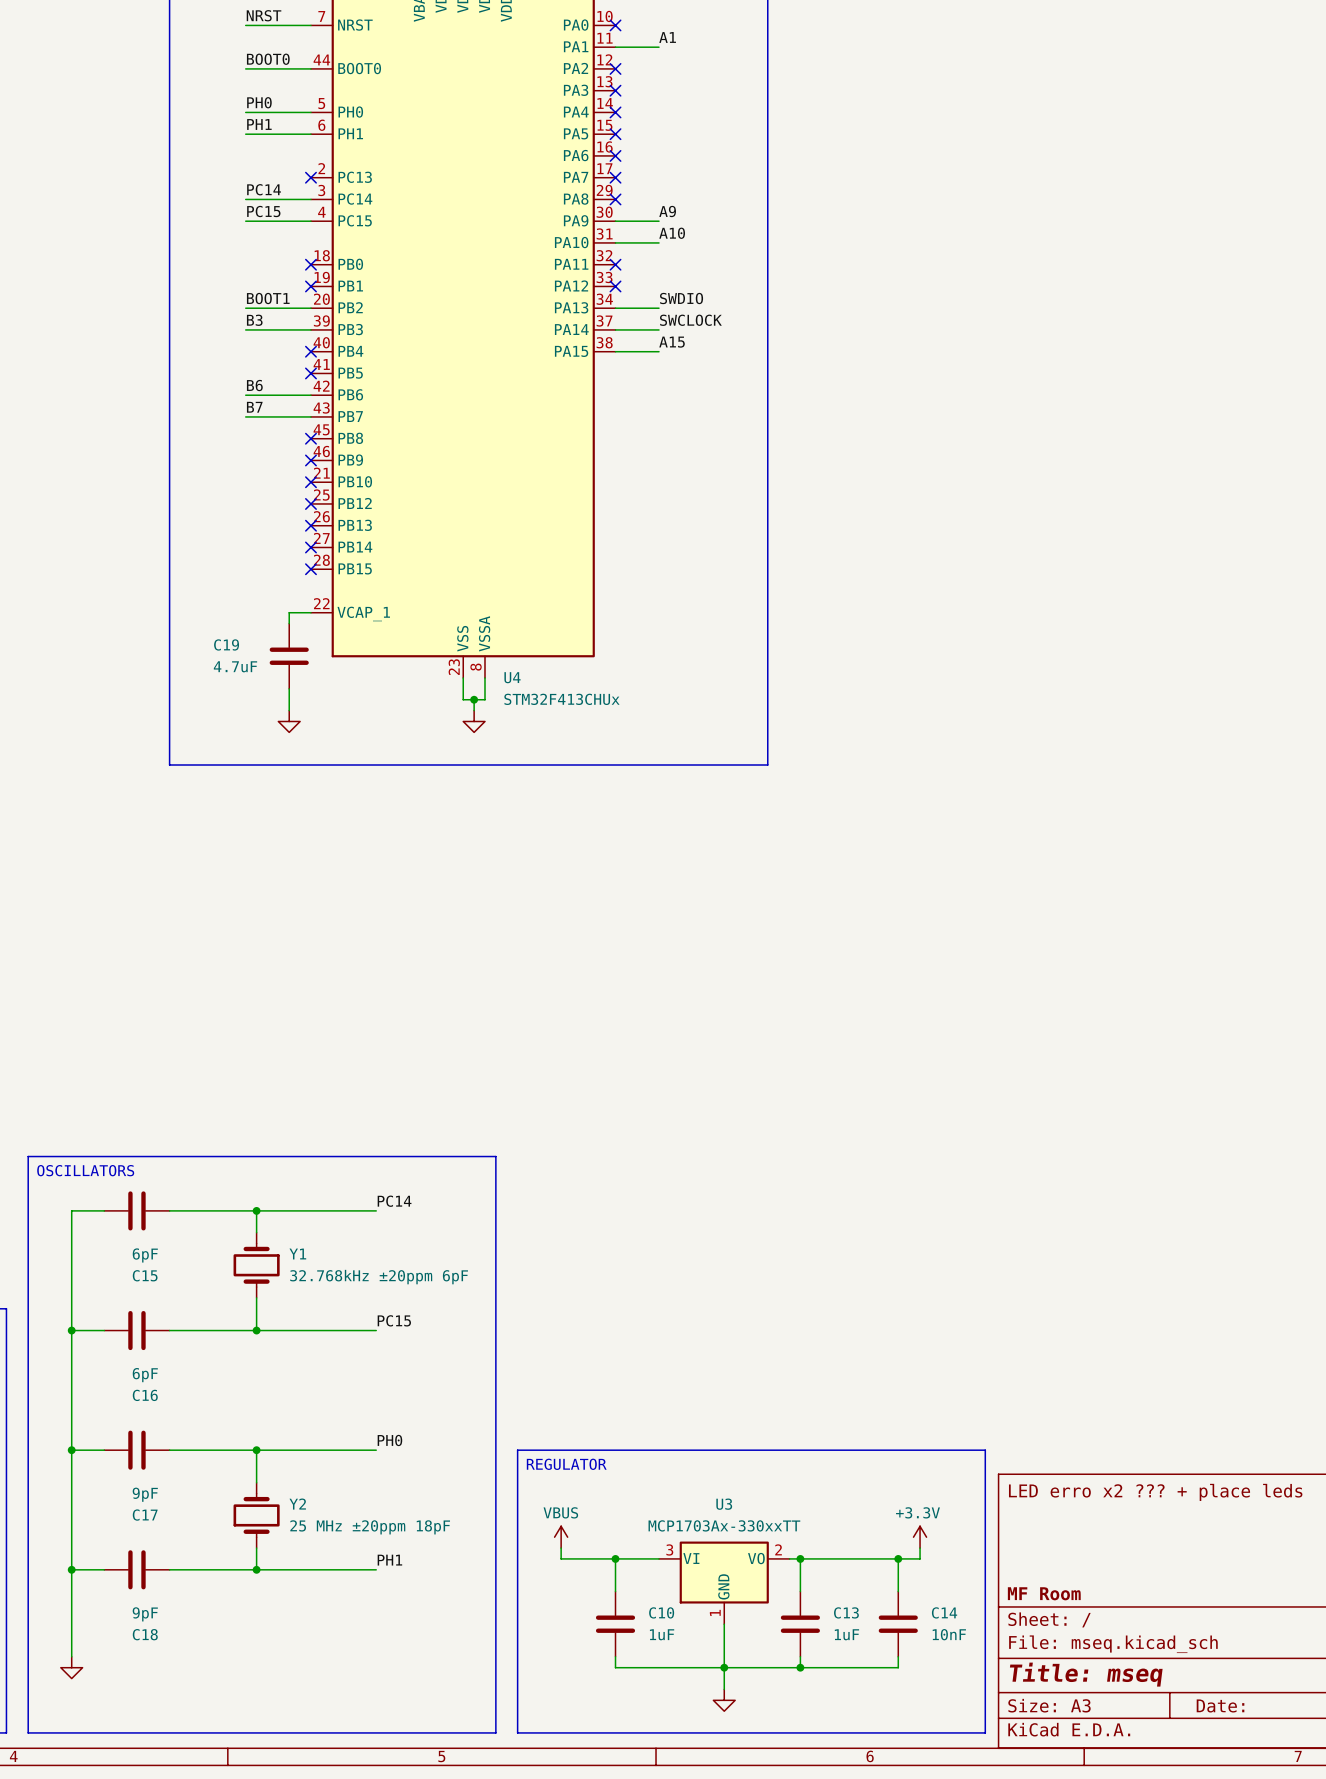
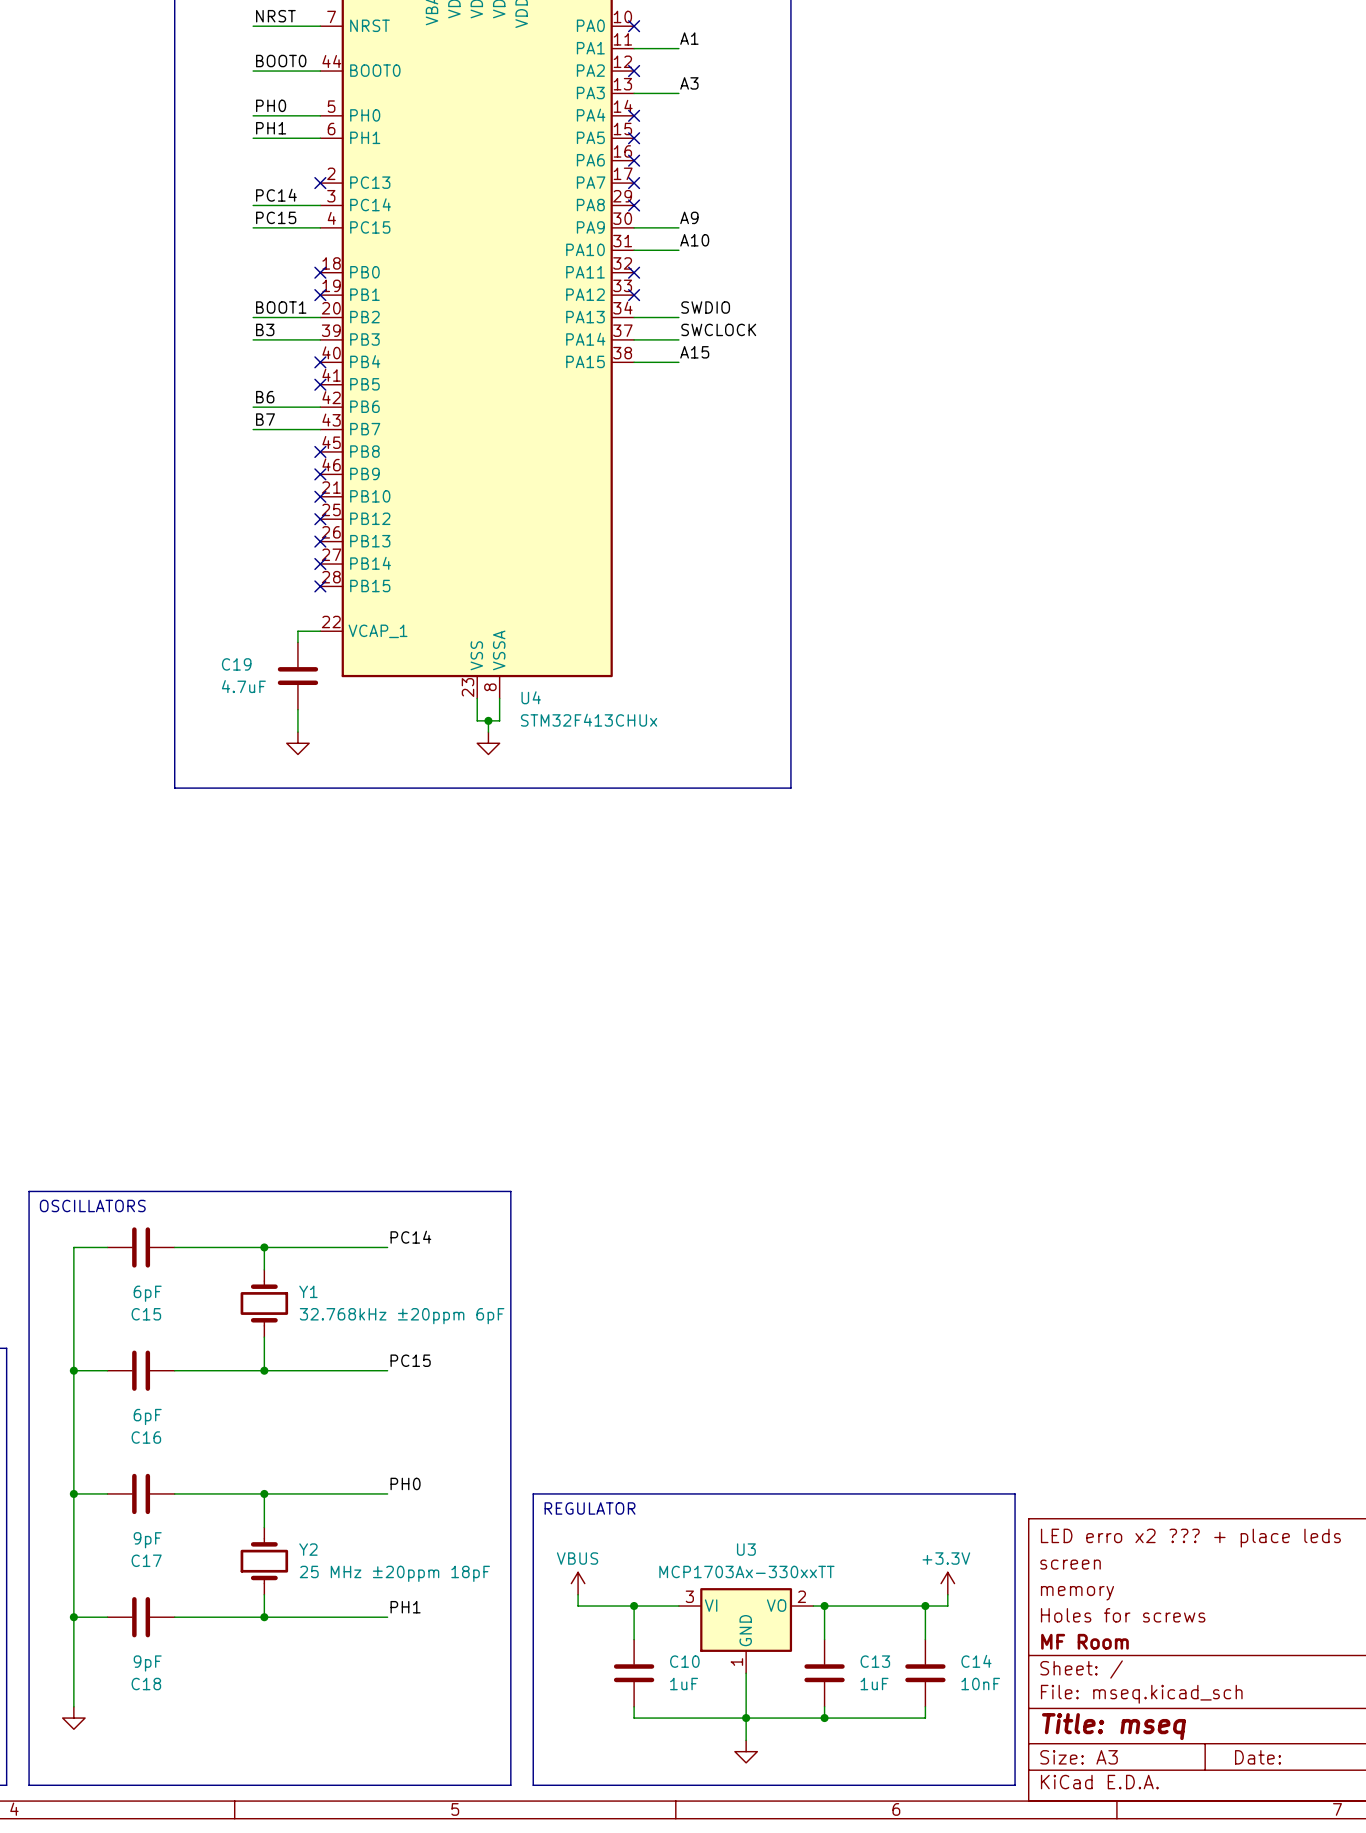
label: none -> A3 (689, 83)
wire: none -> (634, 93) (678, 93)
no-connect mark: (615, 90) -> none
title block: none -> screen (1070, 1564)
title block: none -> memory (1077, 1593)
title block: none -> Holes for screws (1123, 1615)

